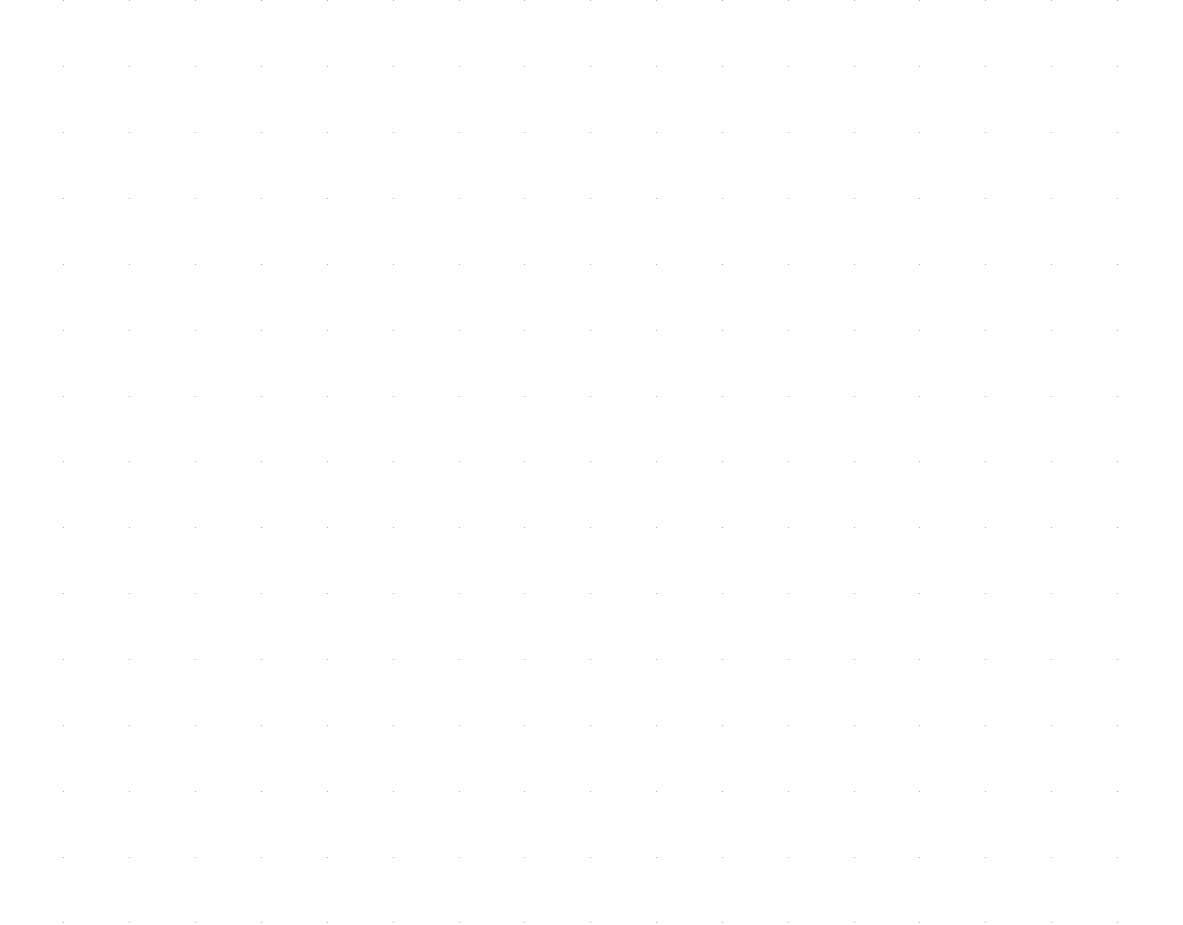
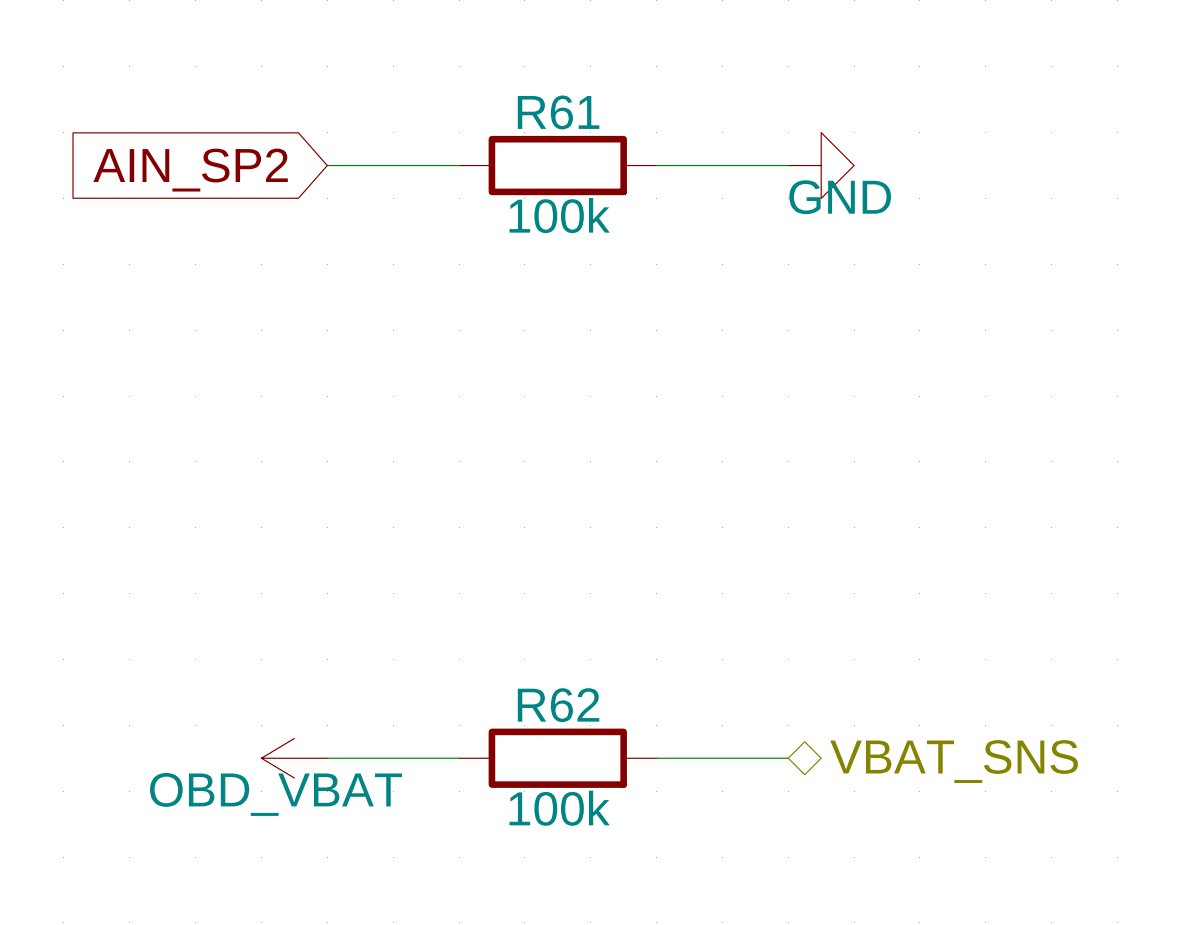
wire: none -> (327, 165) (459, 165)
R61: none -> 100k (557, 165)
wire: none -> (656, 165) (788, 165)
power symbol: none -> GND (821, 165)
global label: none -> AIN_SP2 (190, 170)
power symbol: none -> OBD_VBAT (294, 758)
wire: none -> (327, 758) (459, 758)
R62: none -> 100k (557, 758)
wire: none -> (656, 758) (788, 758)
hierarchical label: none -> VBAT_SNS (954, 761)

